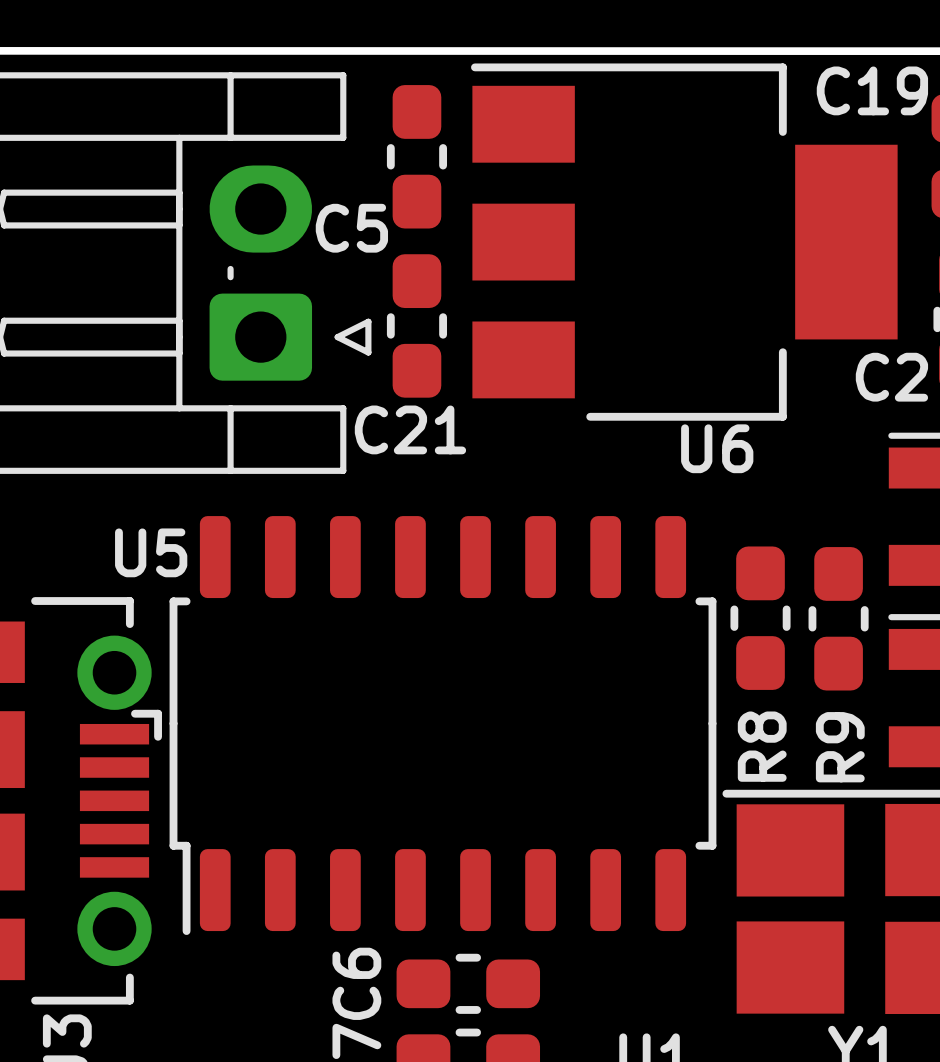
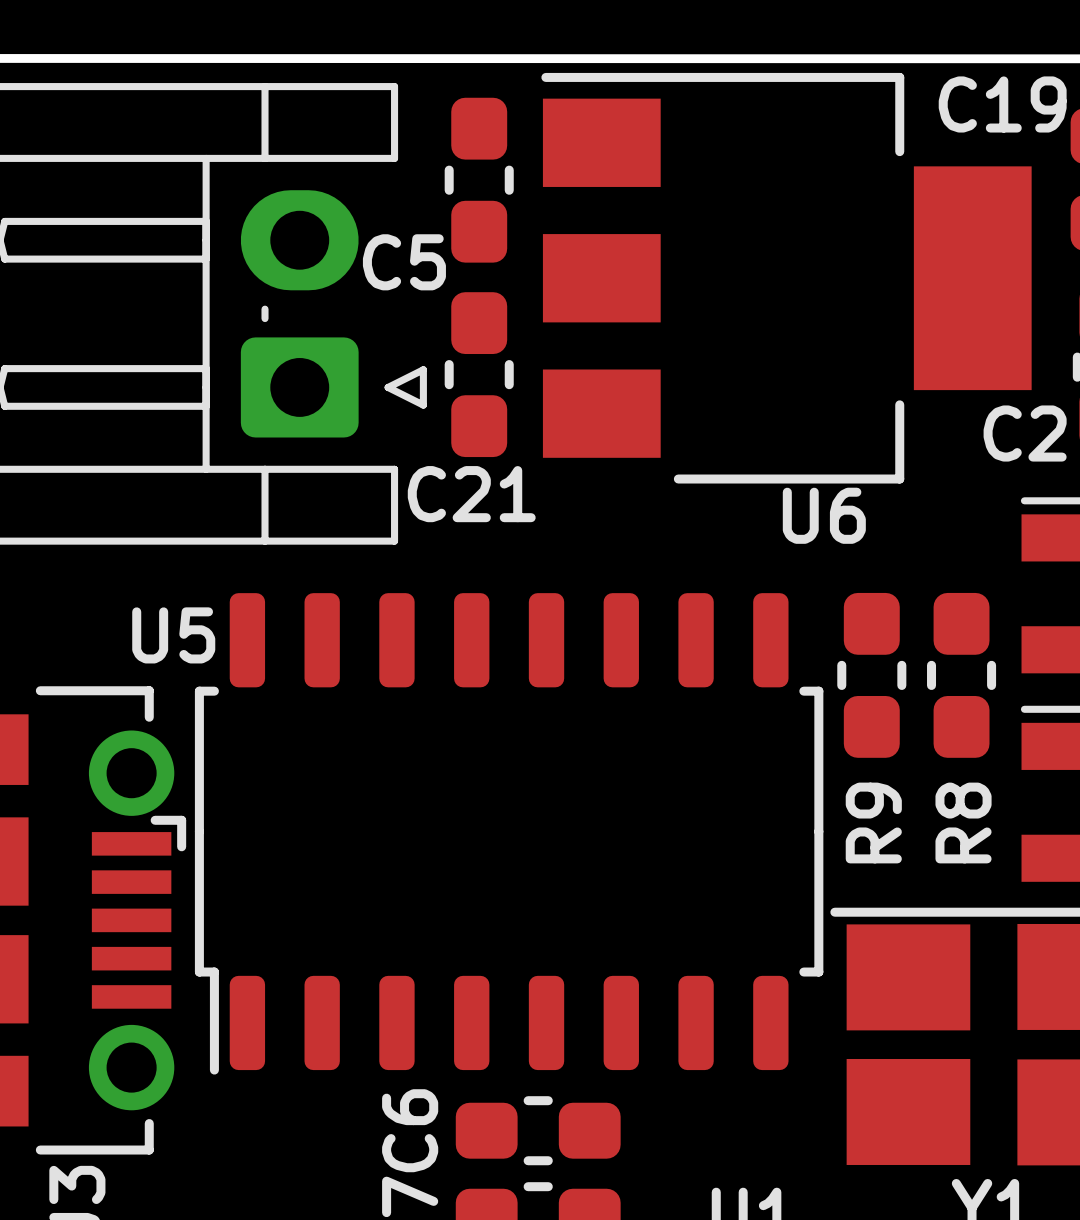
R8 position: (760, 618) -> (961, 675)
R9 position: (838, 618) -> (871, 675)

